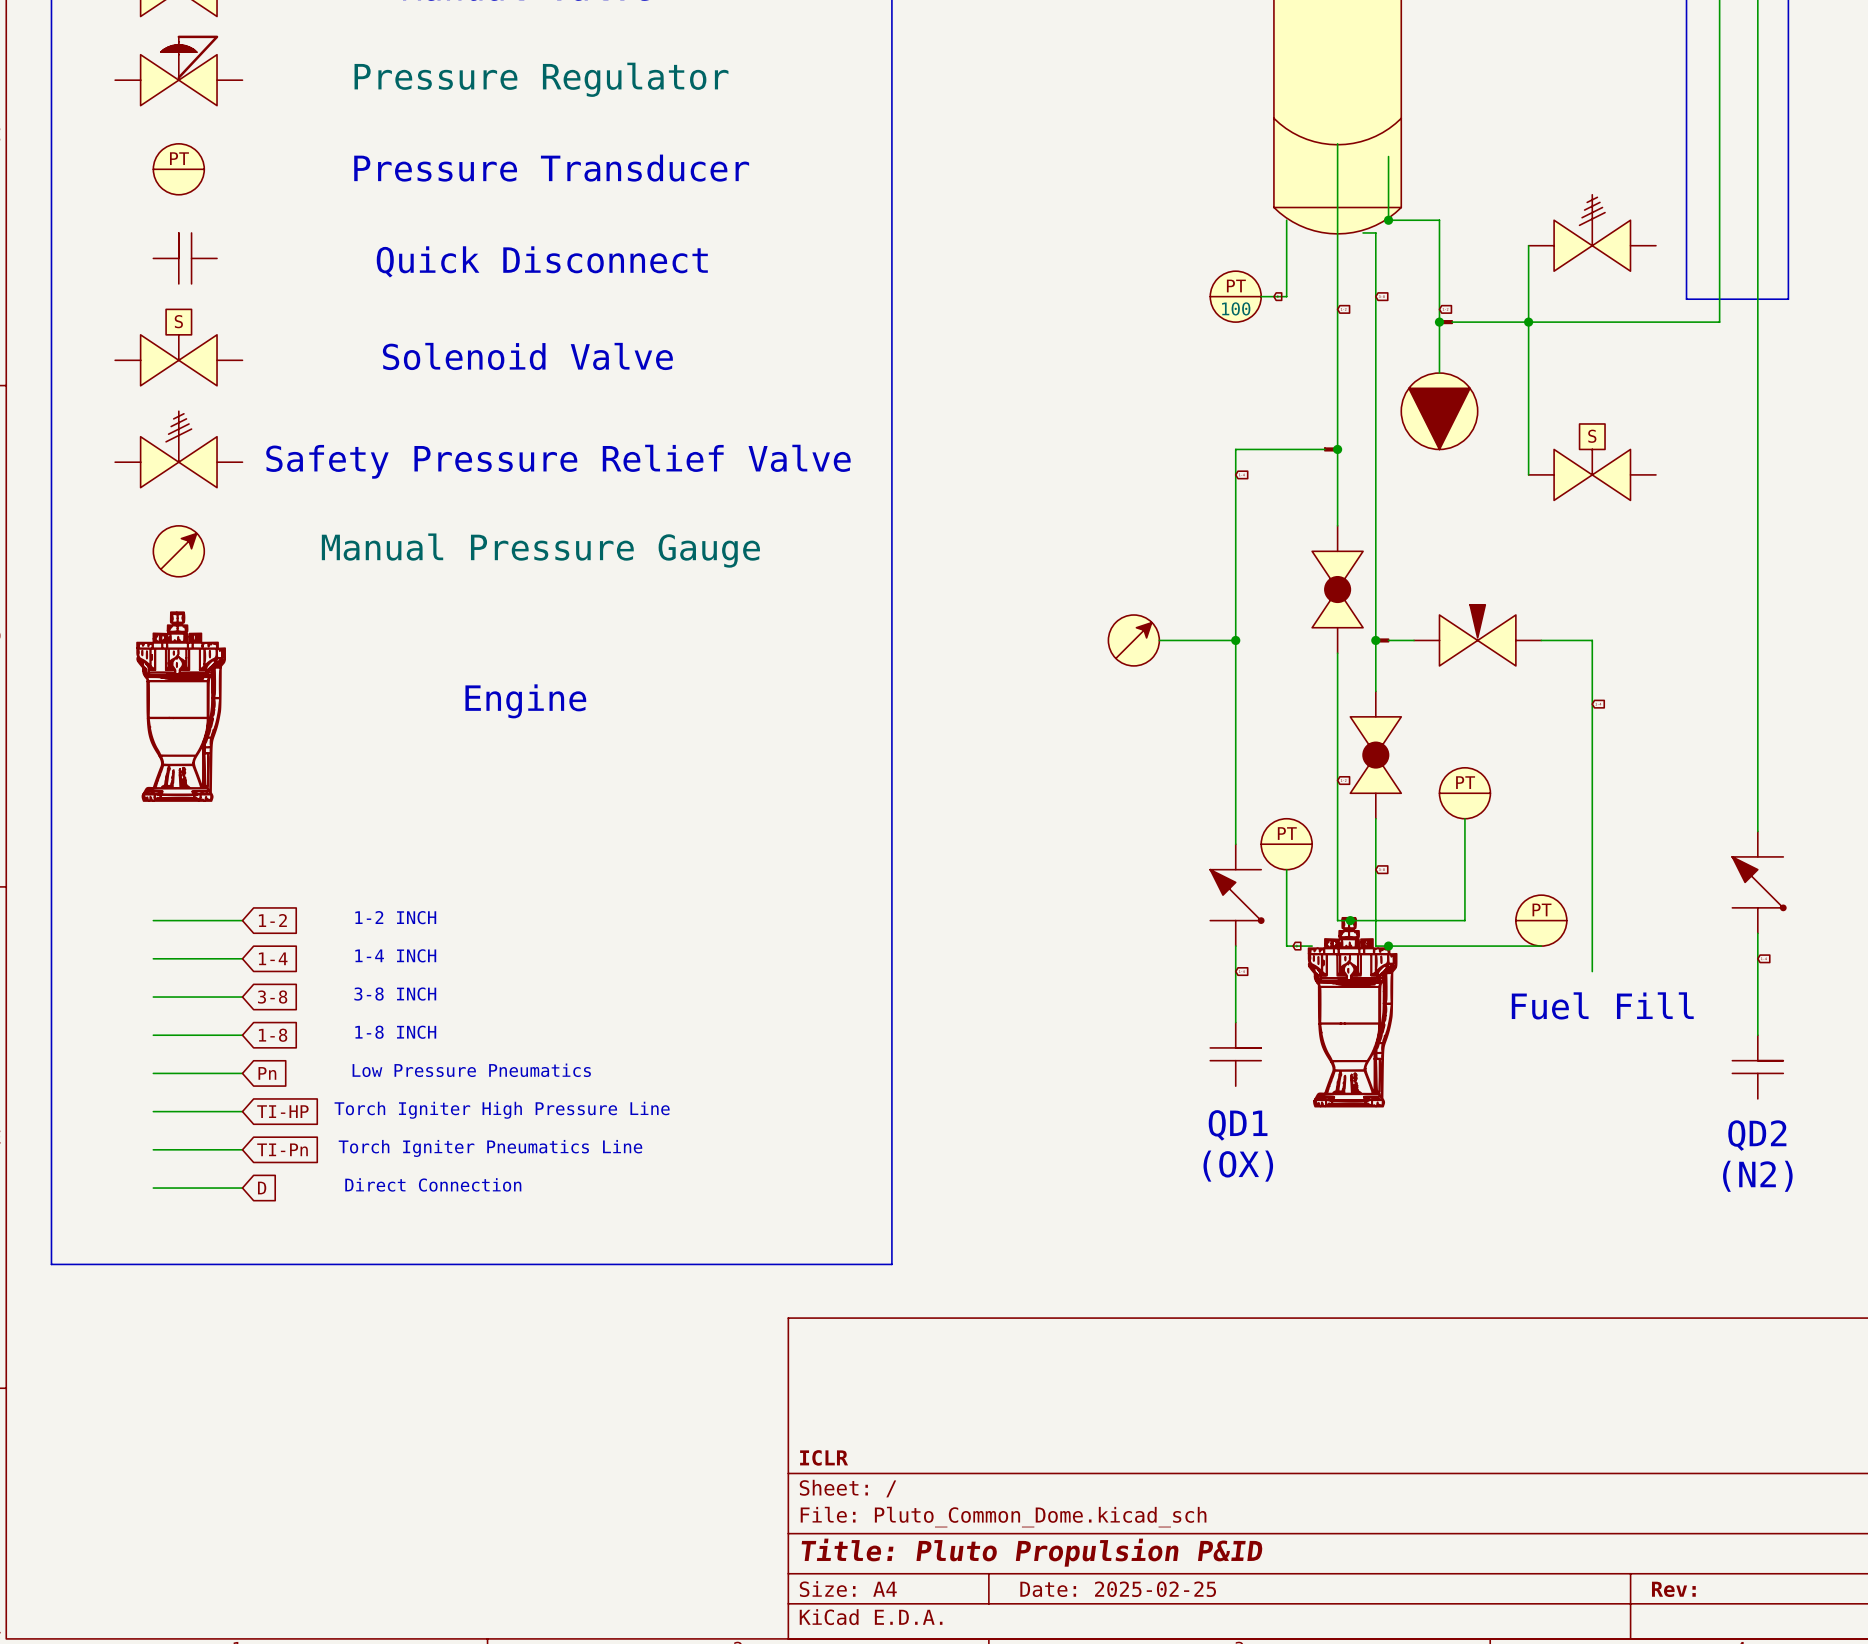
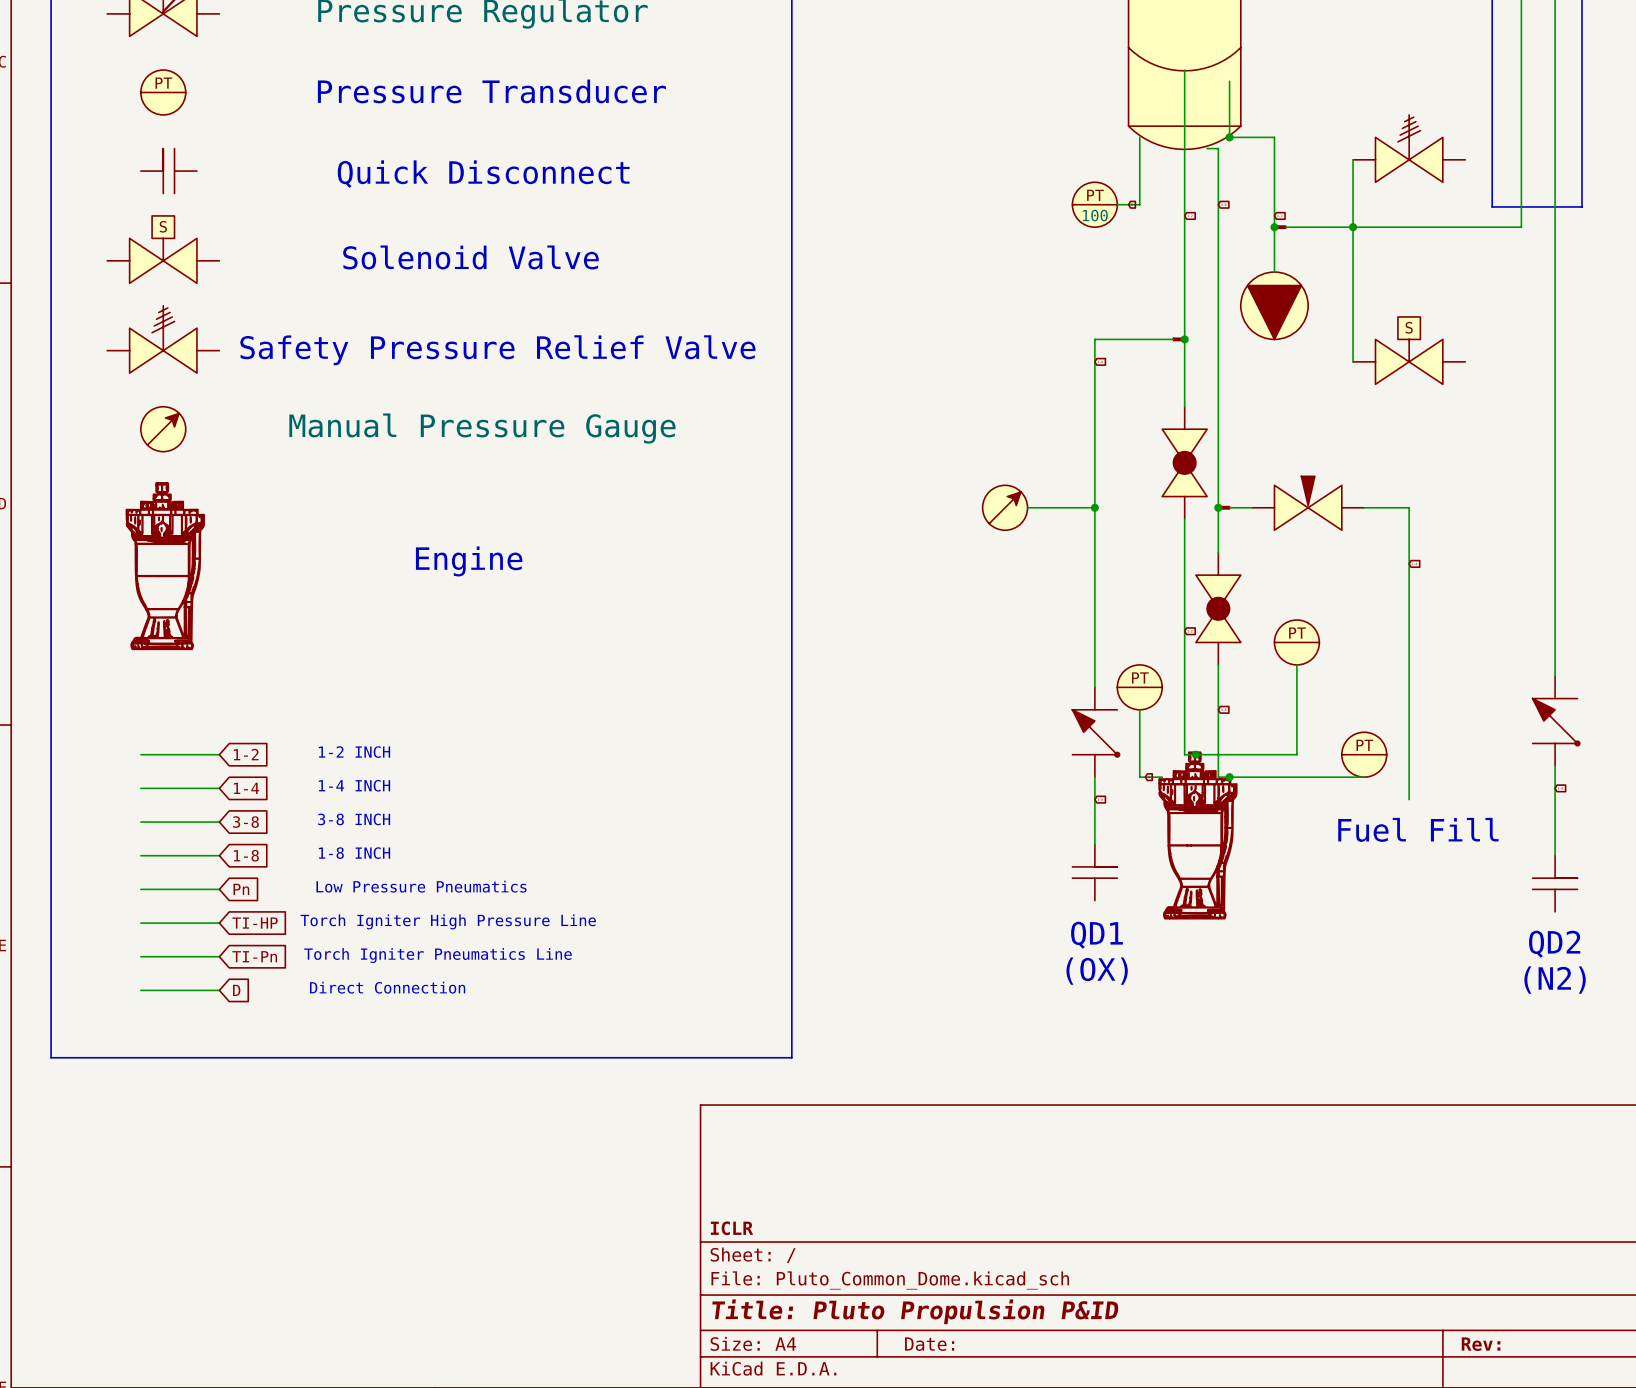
title block: Date: 2025-02-25 (1118, 1589) -> Date: (929, 1344)

